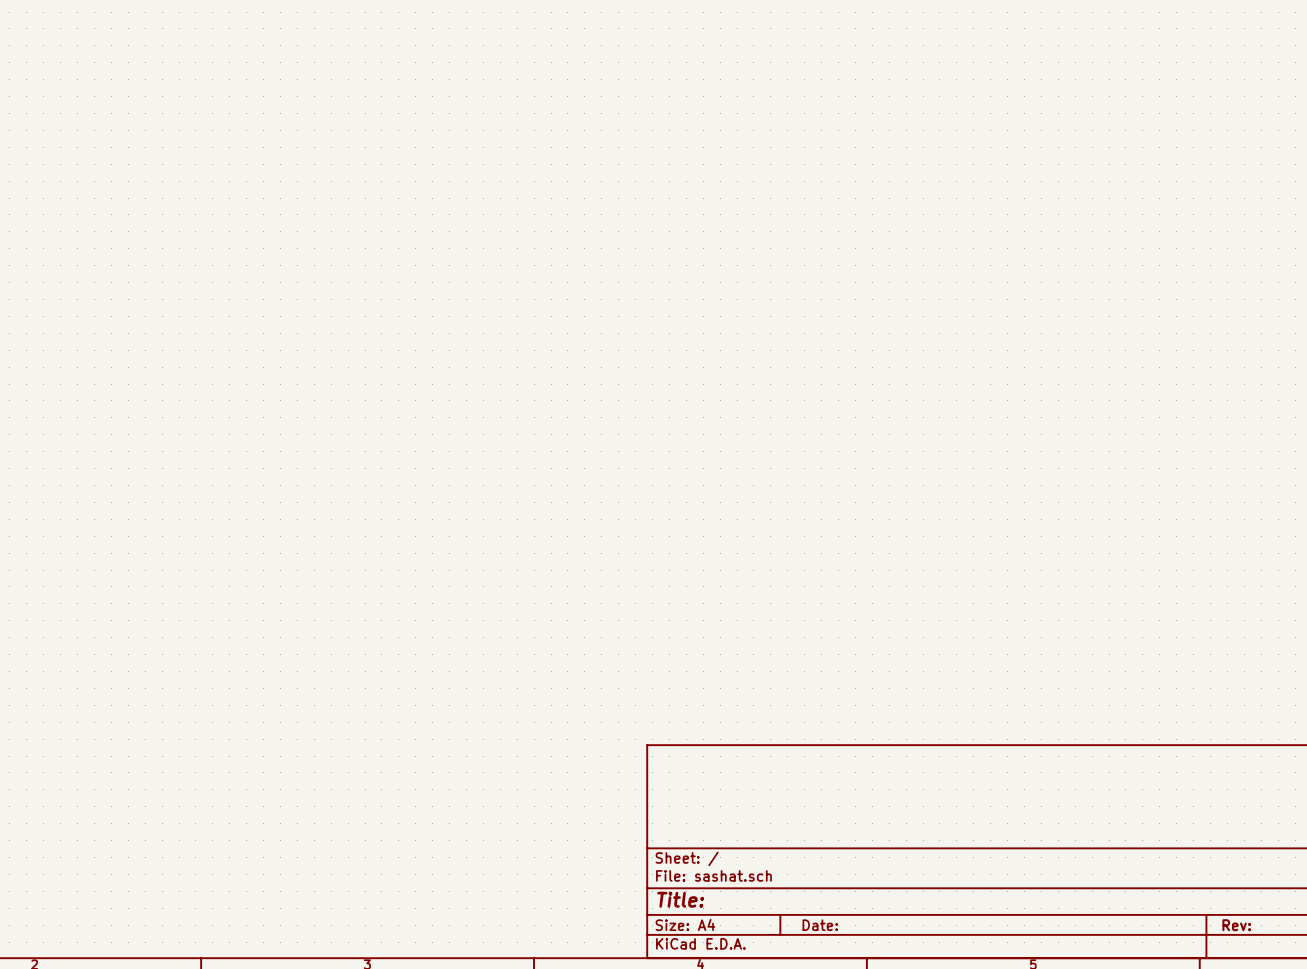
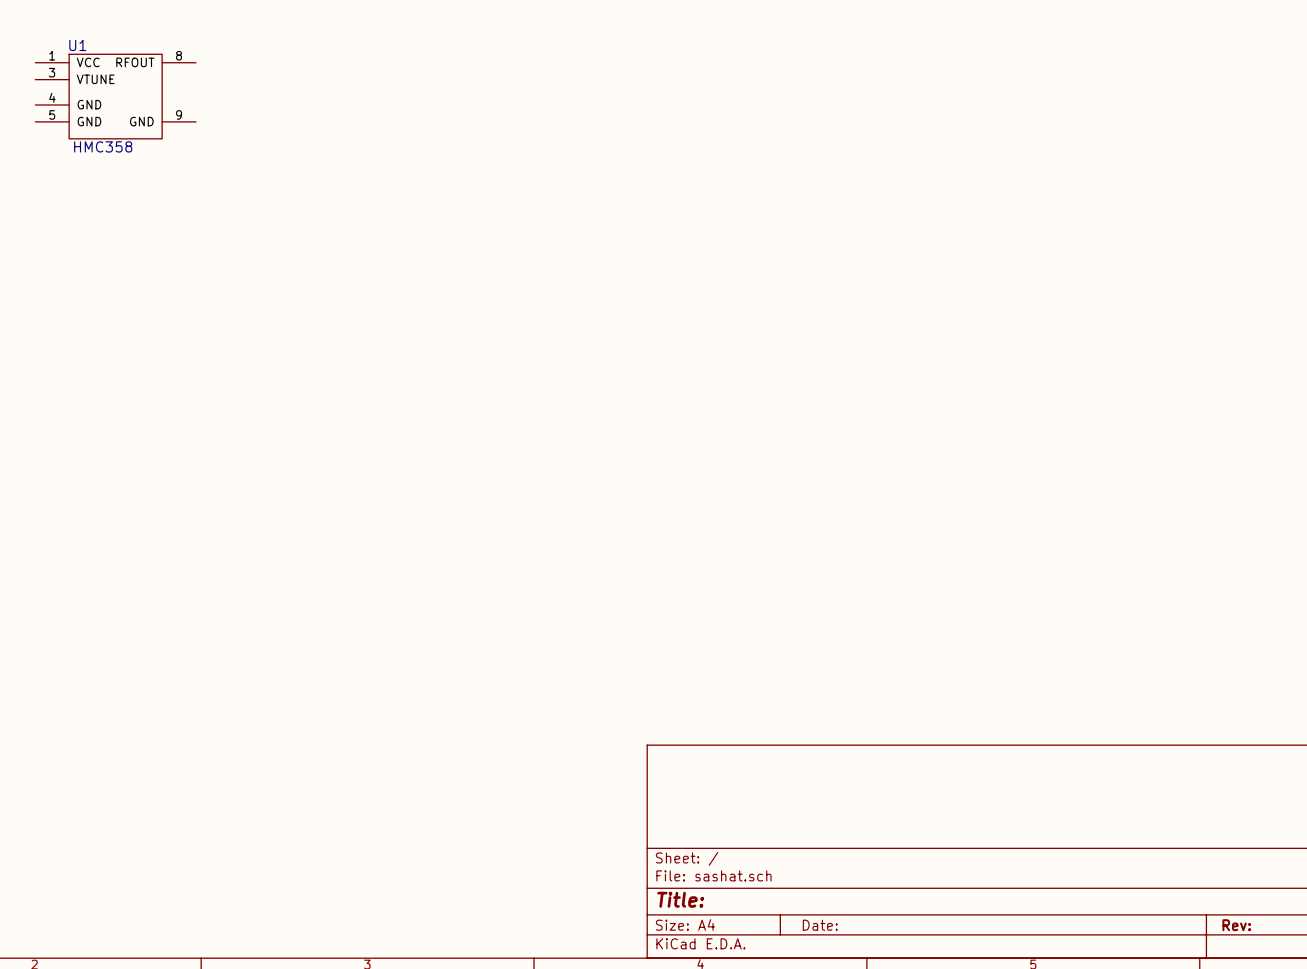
U1: none -> HMC358 (115, 96)

